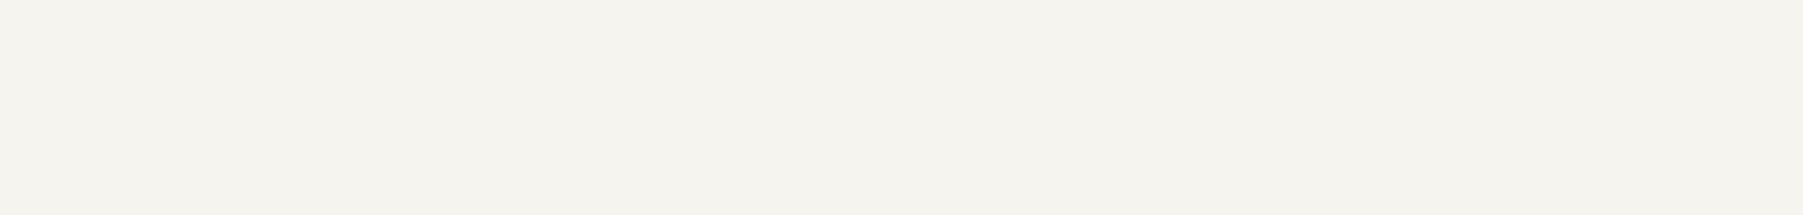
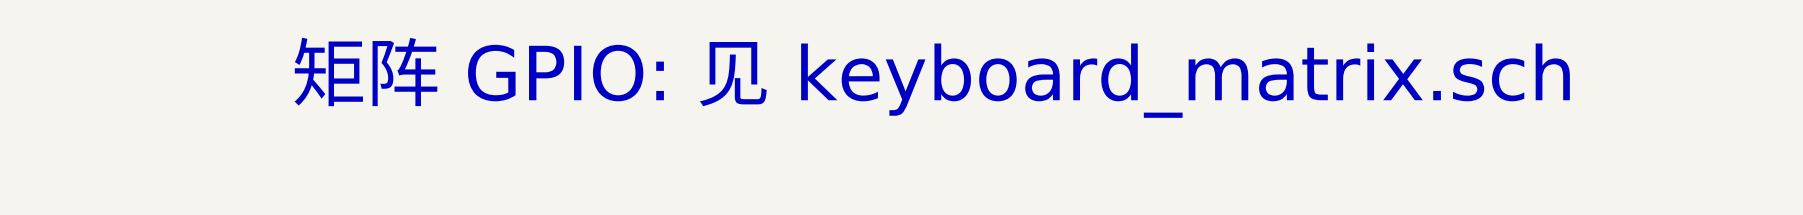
text: none -> 矩阵 GPIO: 见 keyboard_matrix.sch (932, 77)

